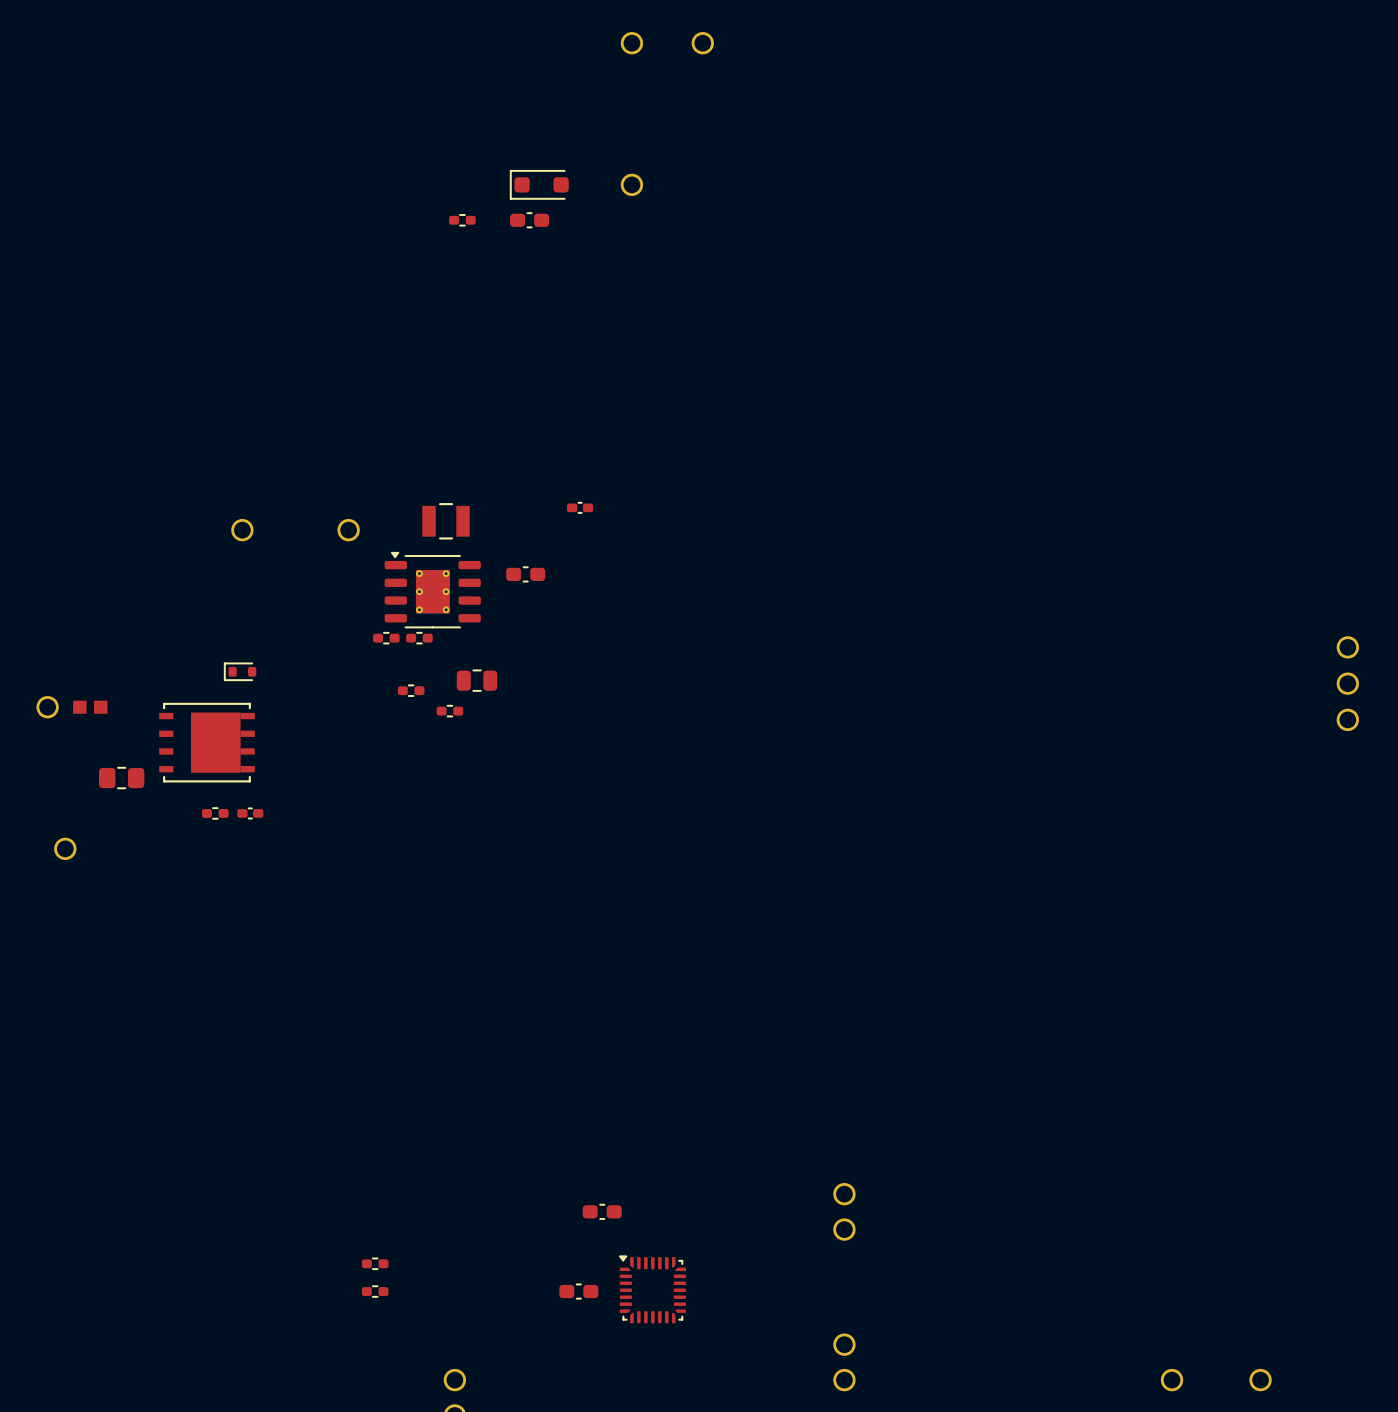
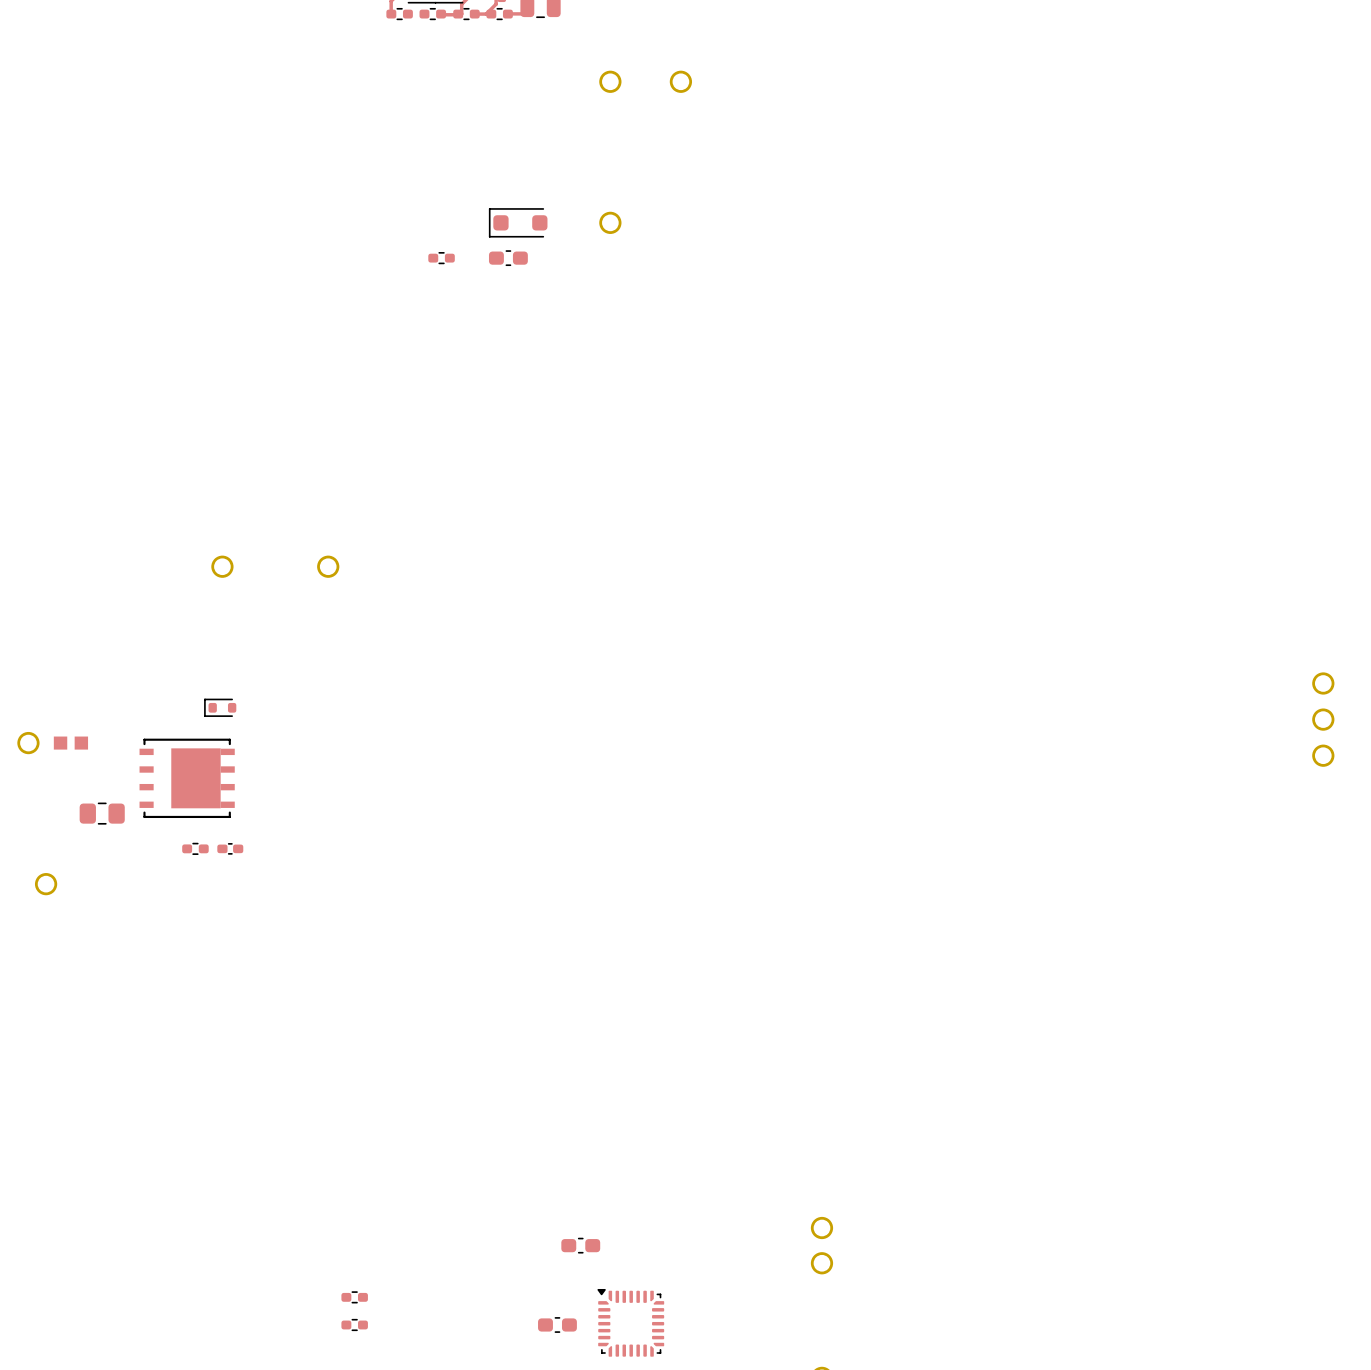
part: (580, 507) -> none
part: (446, 521) -> none
part: (525, 574) -> none
part: (432, 590) -> none
part: (386, 638) -> none
part: (419, 638) -> none
part: (477, 680) -> none
part: (411, 690) -> none
part: (449, 711) -> none

